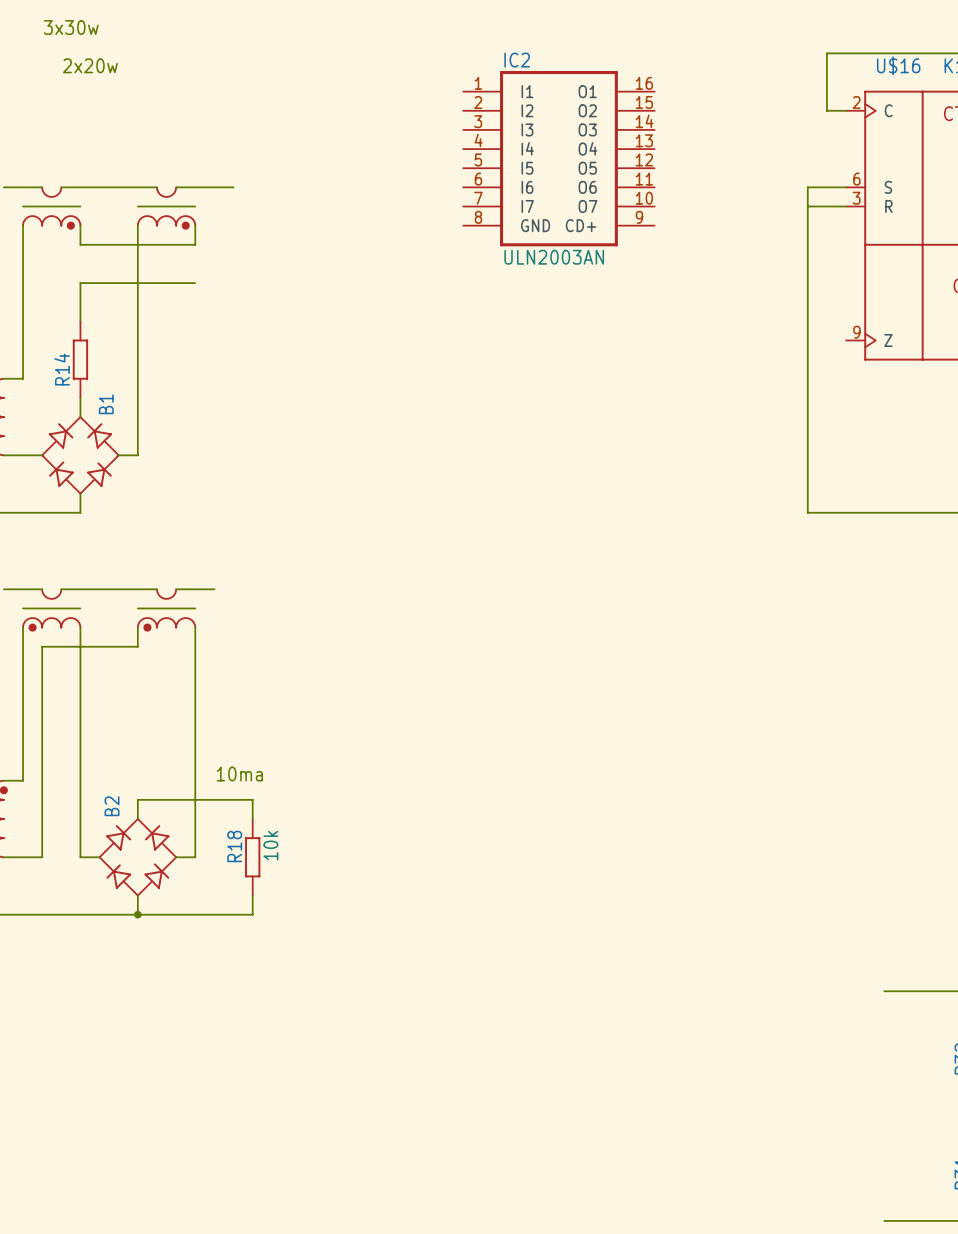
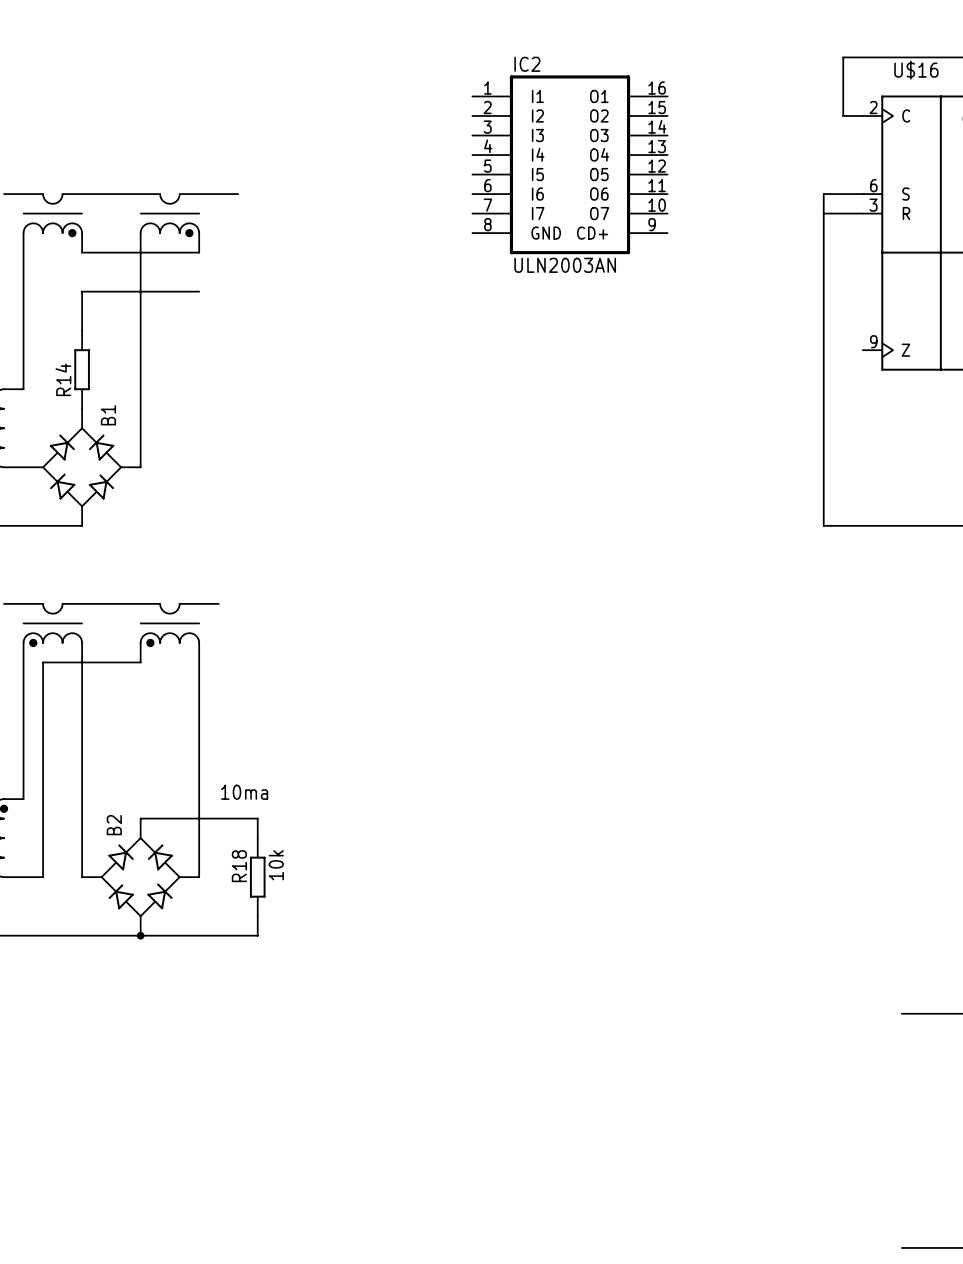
text: 3x30w (71, 27) -> none
text: 2x20w (90, 65) -> none

